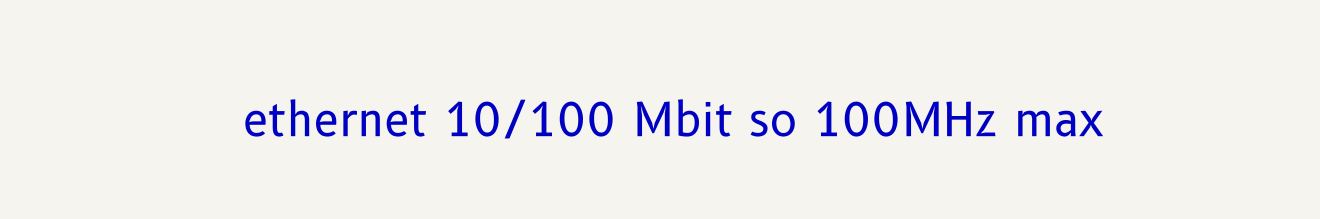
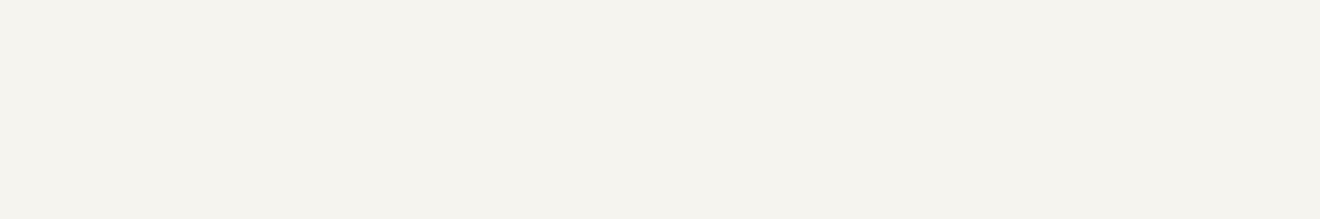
text: ethernet 10/100 Mbit so 100MHz max (674, 118) -> none

